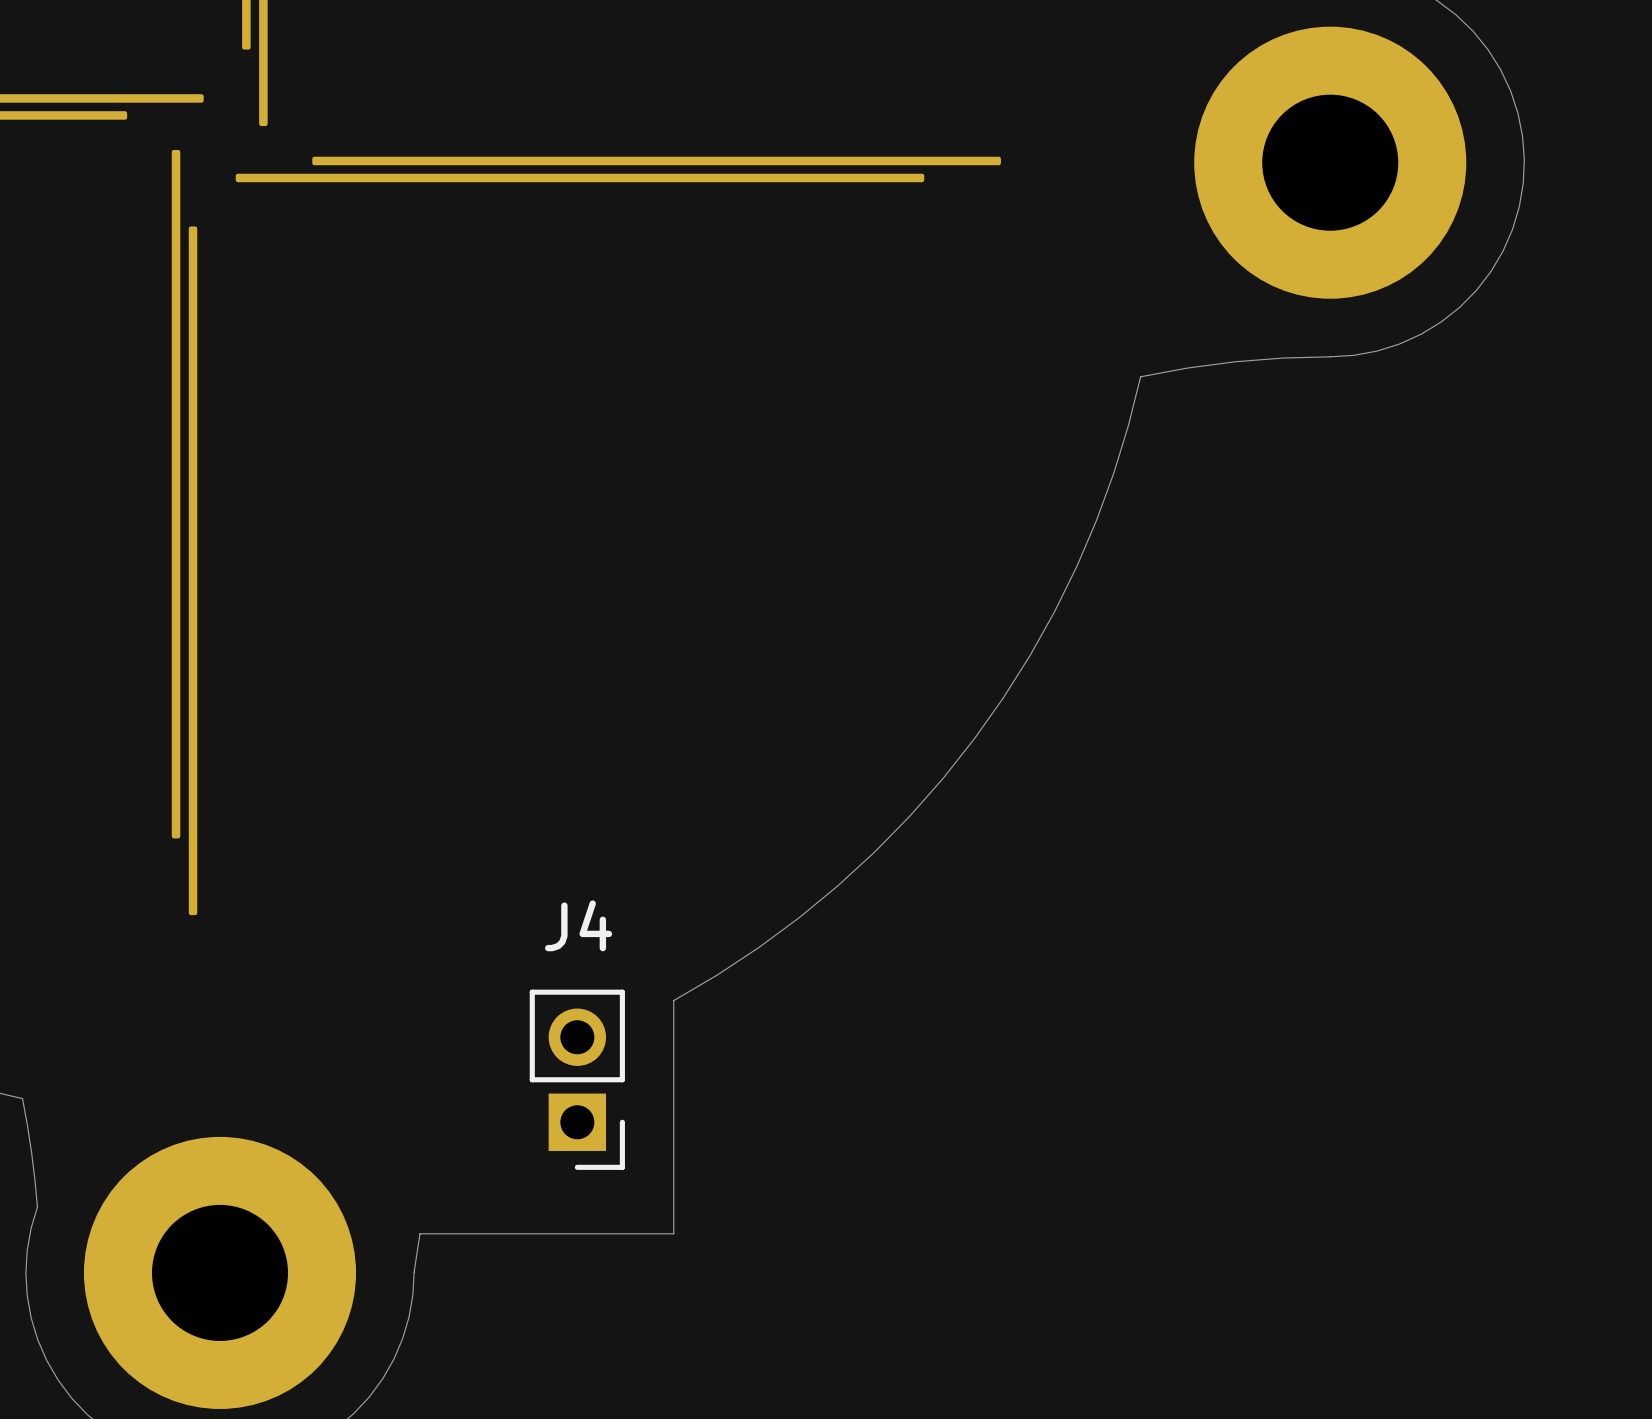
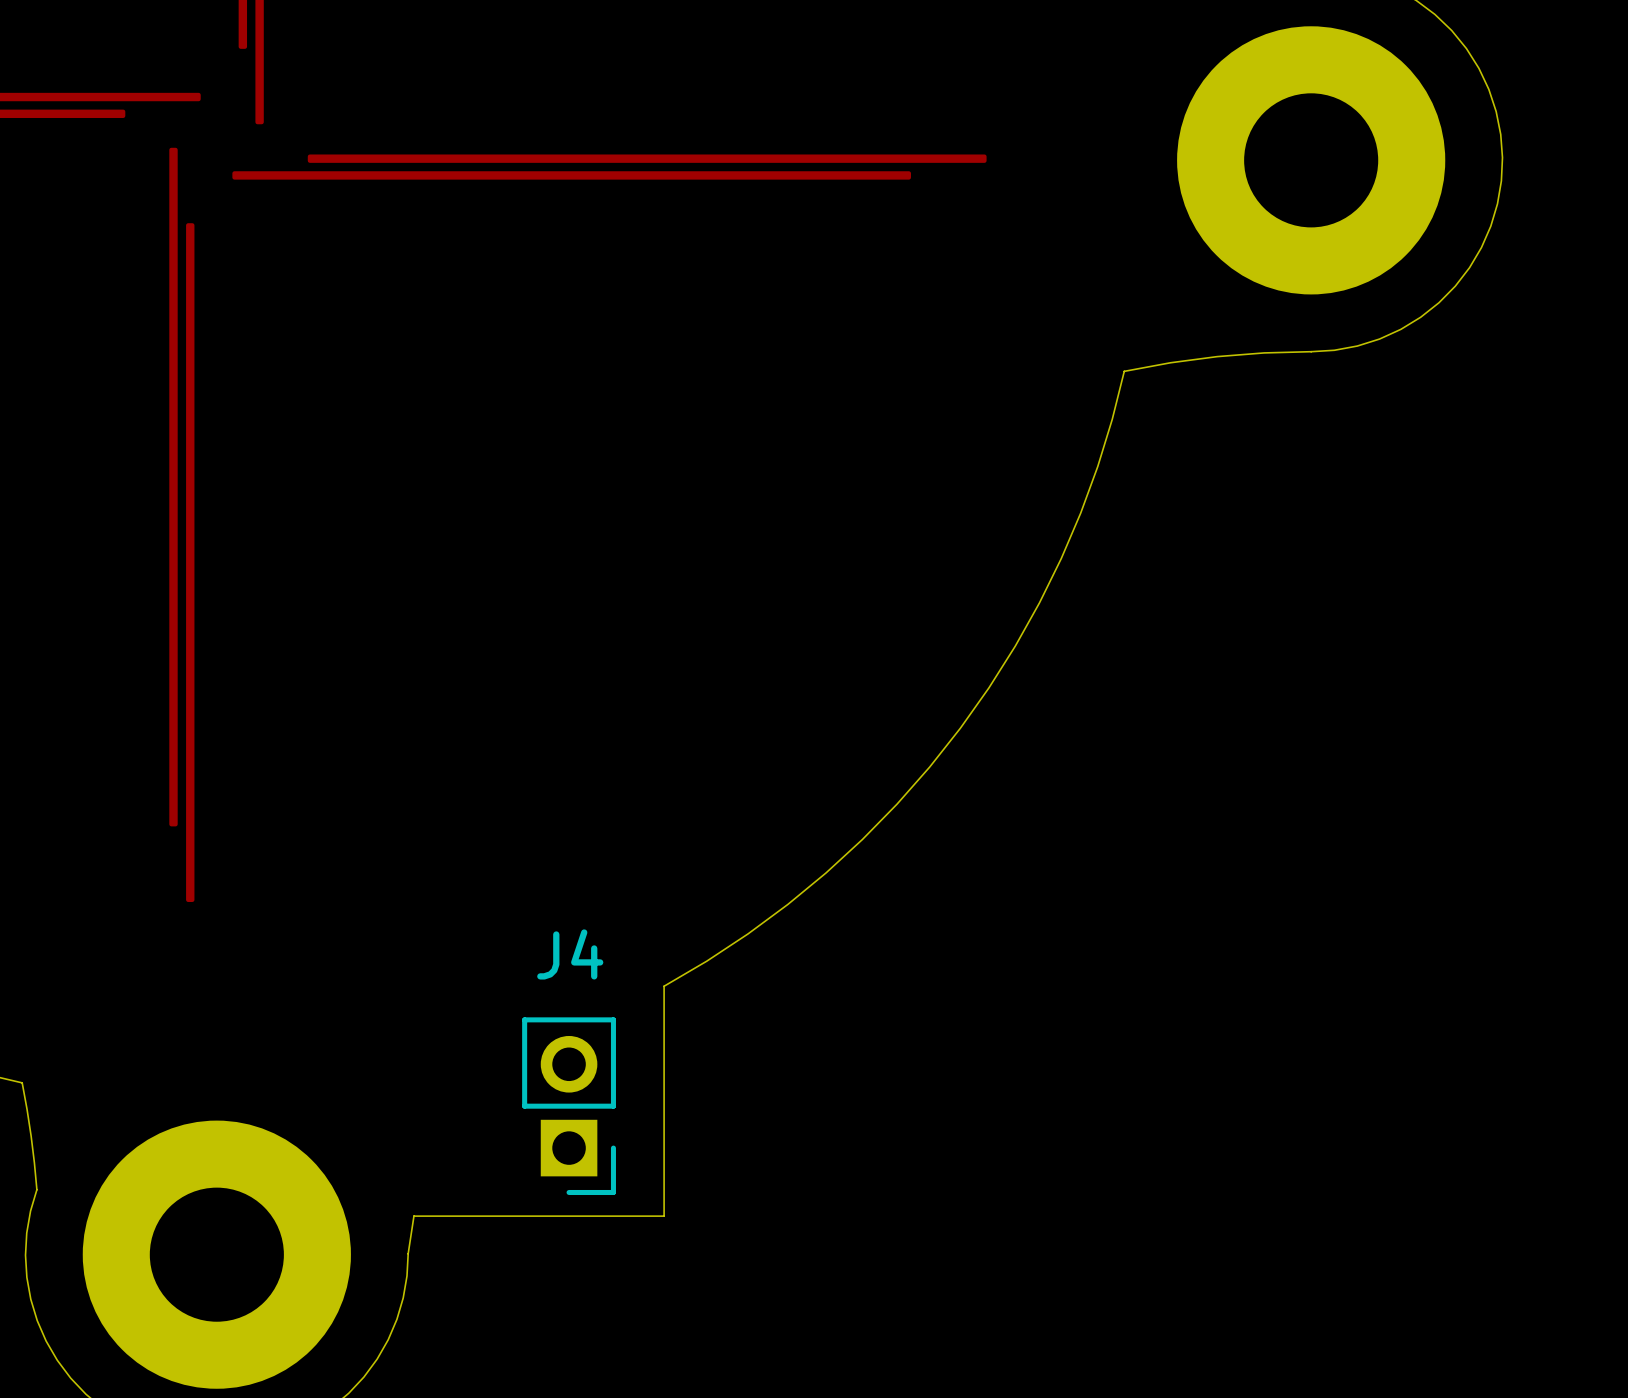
J4 position: (577, 1079) -> (569, 1106)

